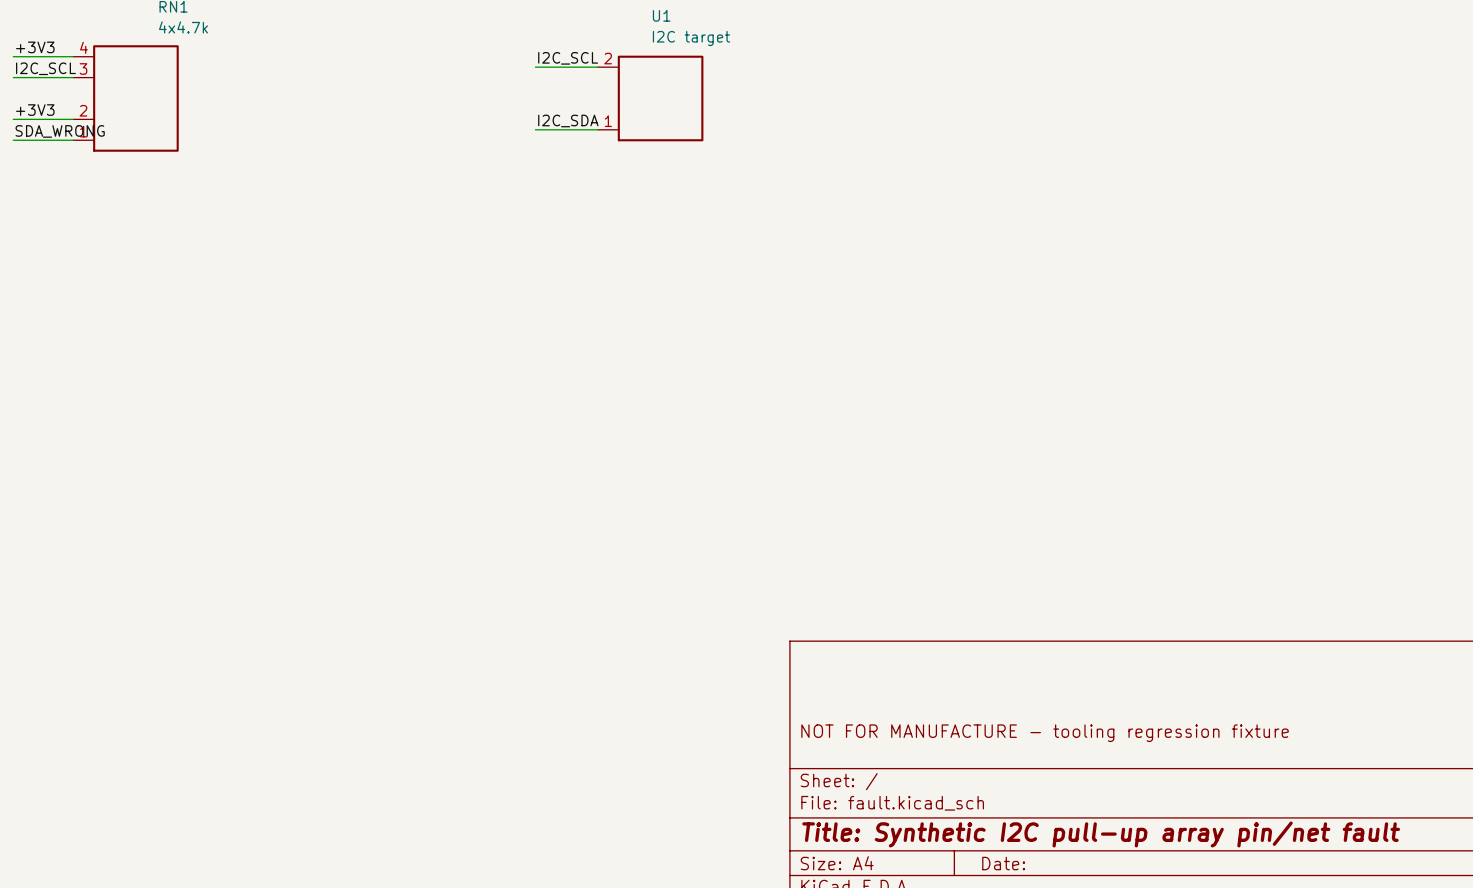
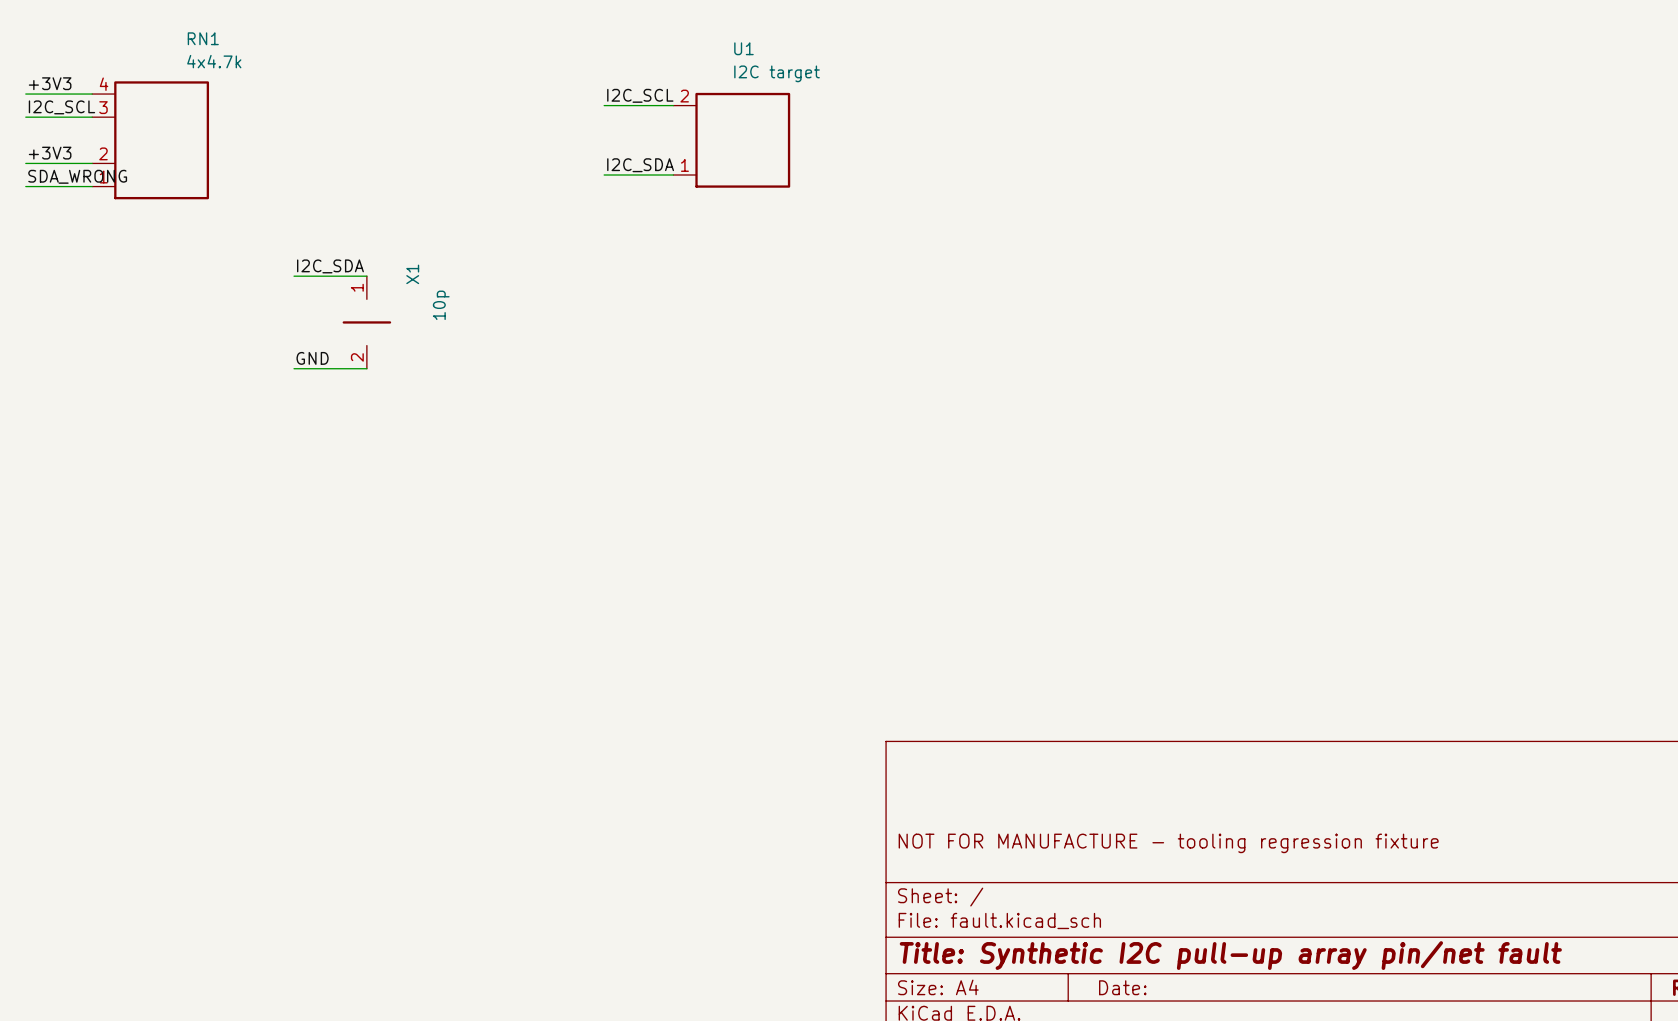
label: none -> I2C_SDA (330, 266)
wire: none -> (294, 276) (366, 276)
X1: none -> 10p (366, 322)
label: none -> GND (312, 358)
wire: none -> (294, 368) (366, 368)

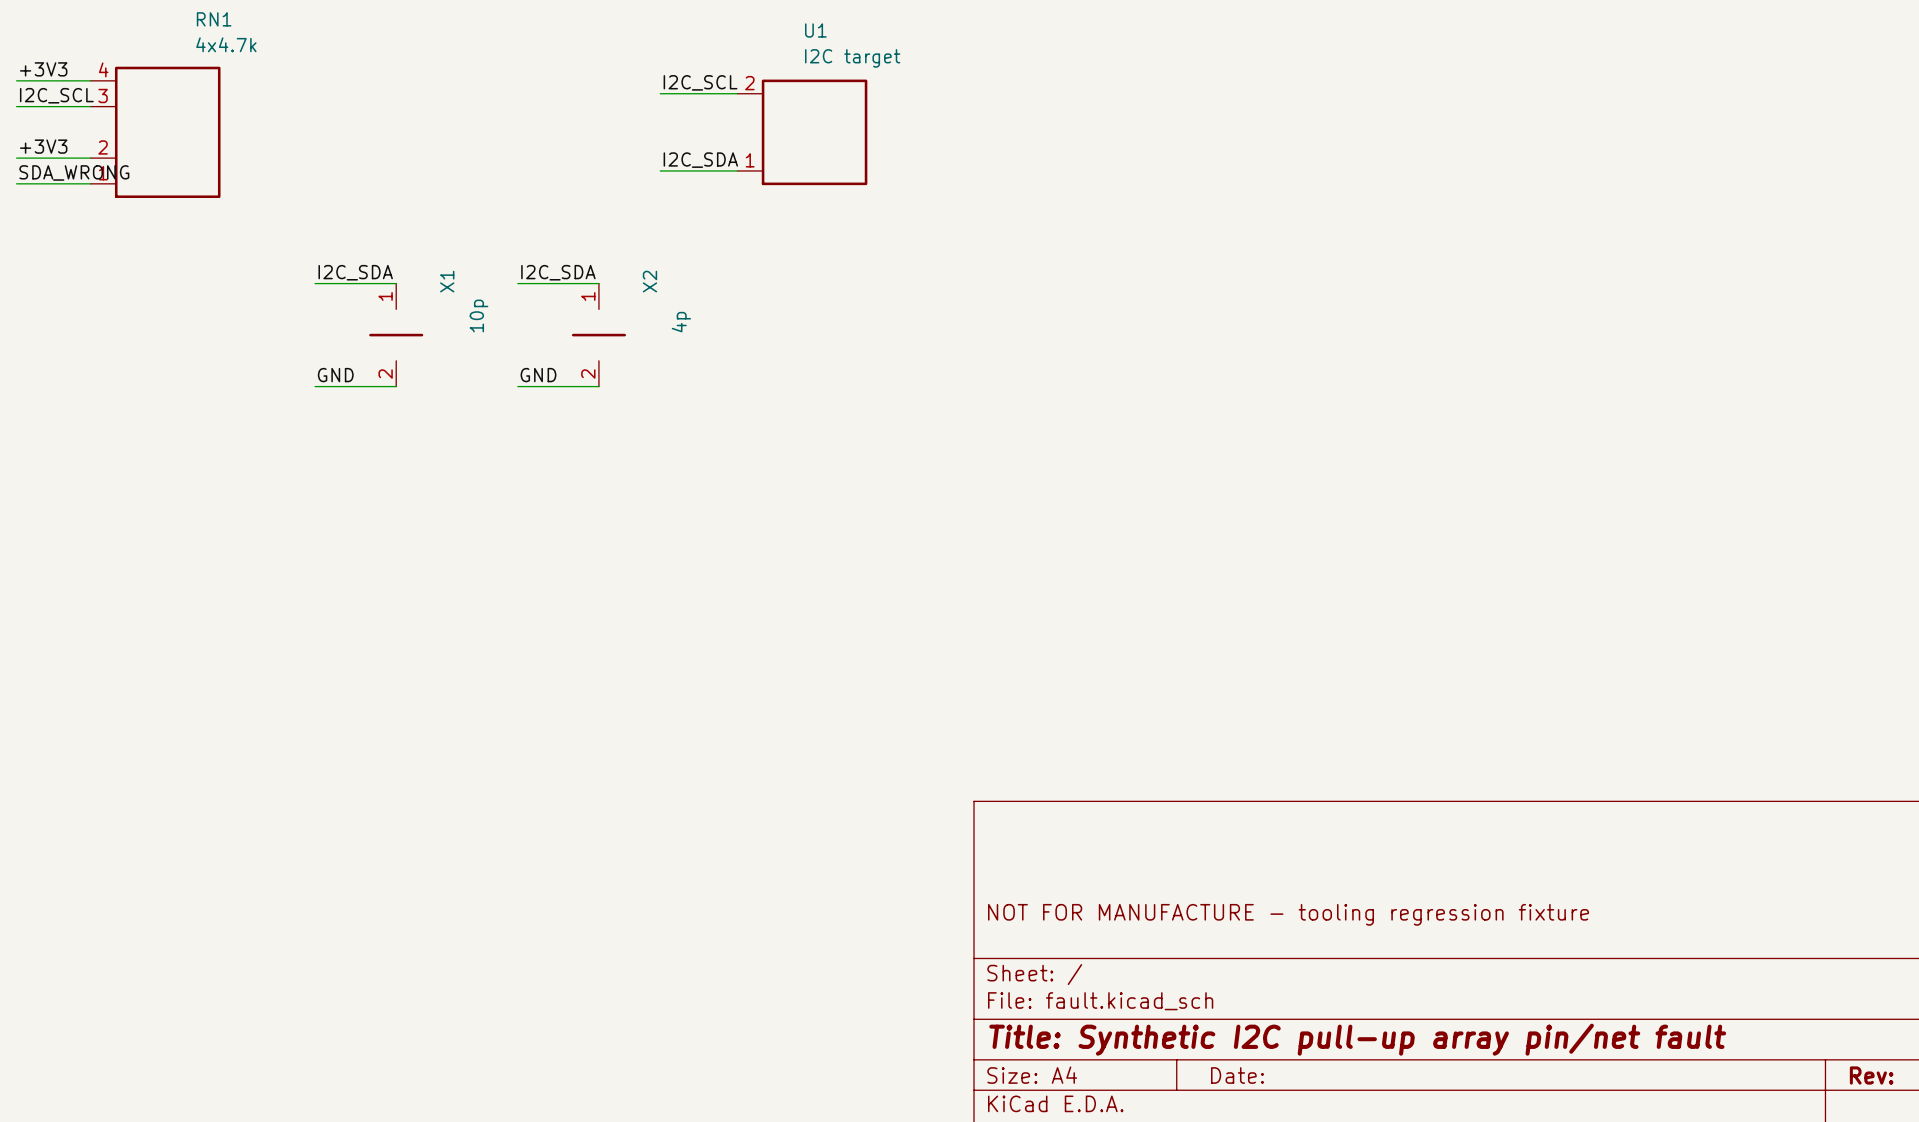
label: none -> I2C_SDA (558, 272)
wire: none -> (517, 283) (598, 283)
X2: none -> 4p (598, 335)
label: none -> GND (538, 375)
wire: none -> (517, 386) (598, 386)

